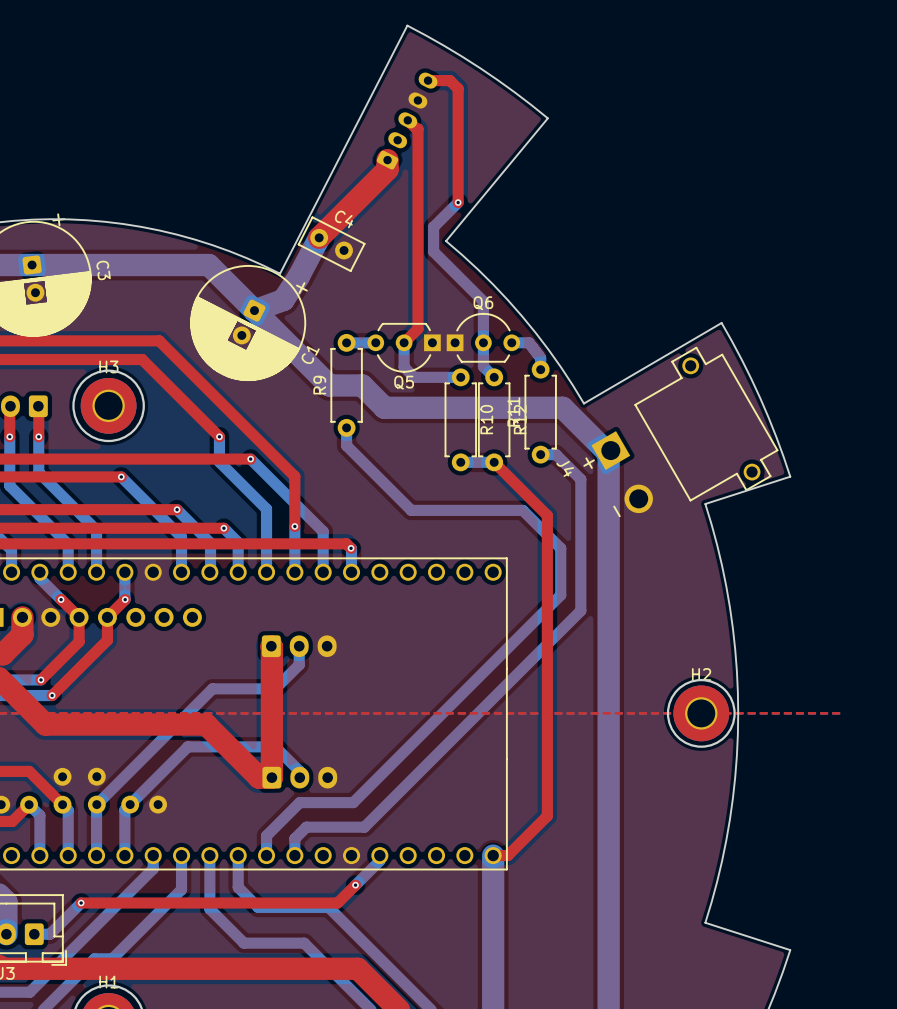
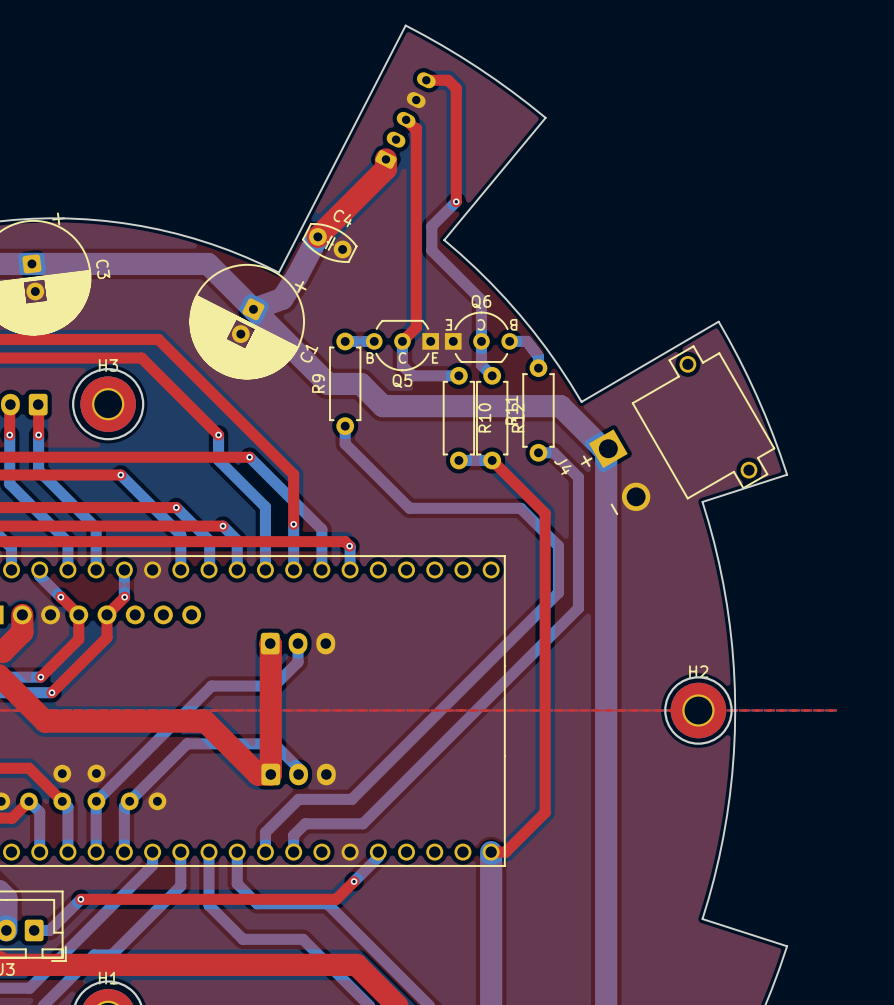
C4 footprint: [297, 216, 366, 272] -> [302, 223, 358, 263]
Q6 footprint: [446, 313, 521, 363] -> [444, 311, 519, 363]
Q5 footprint: [367, 323, 441, 373] -> [365, 320, 440, 371]

